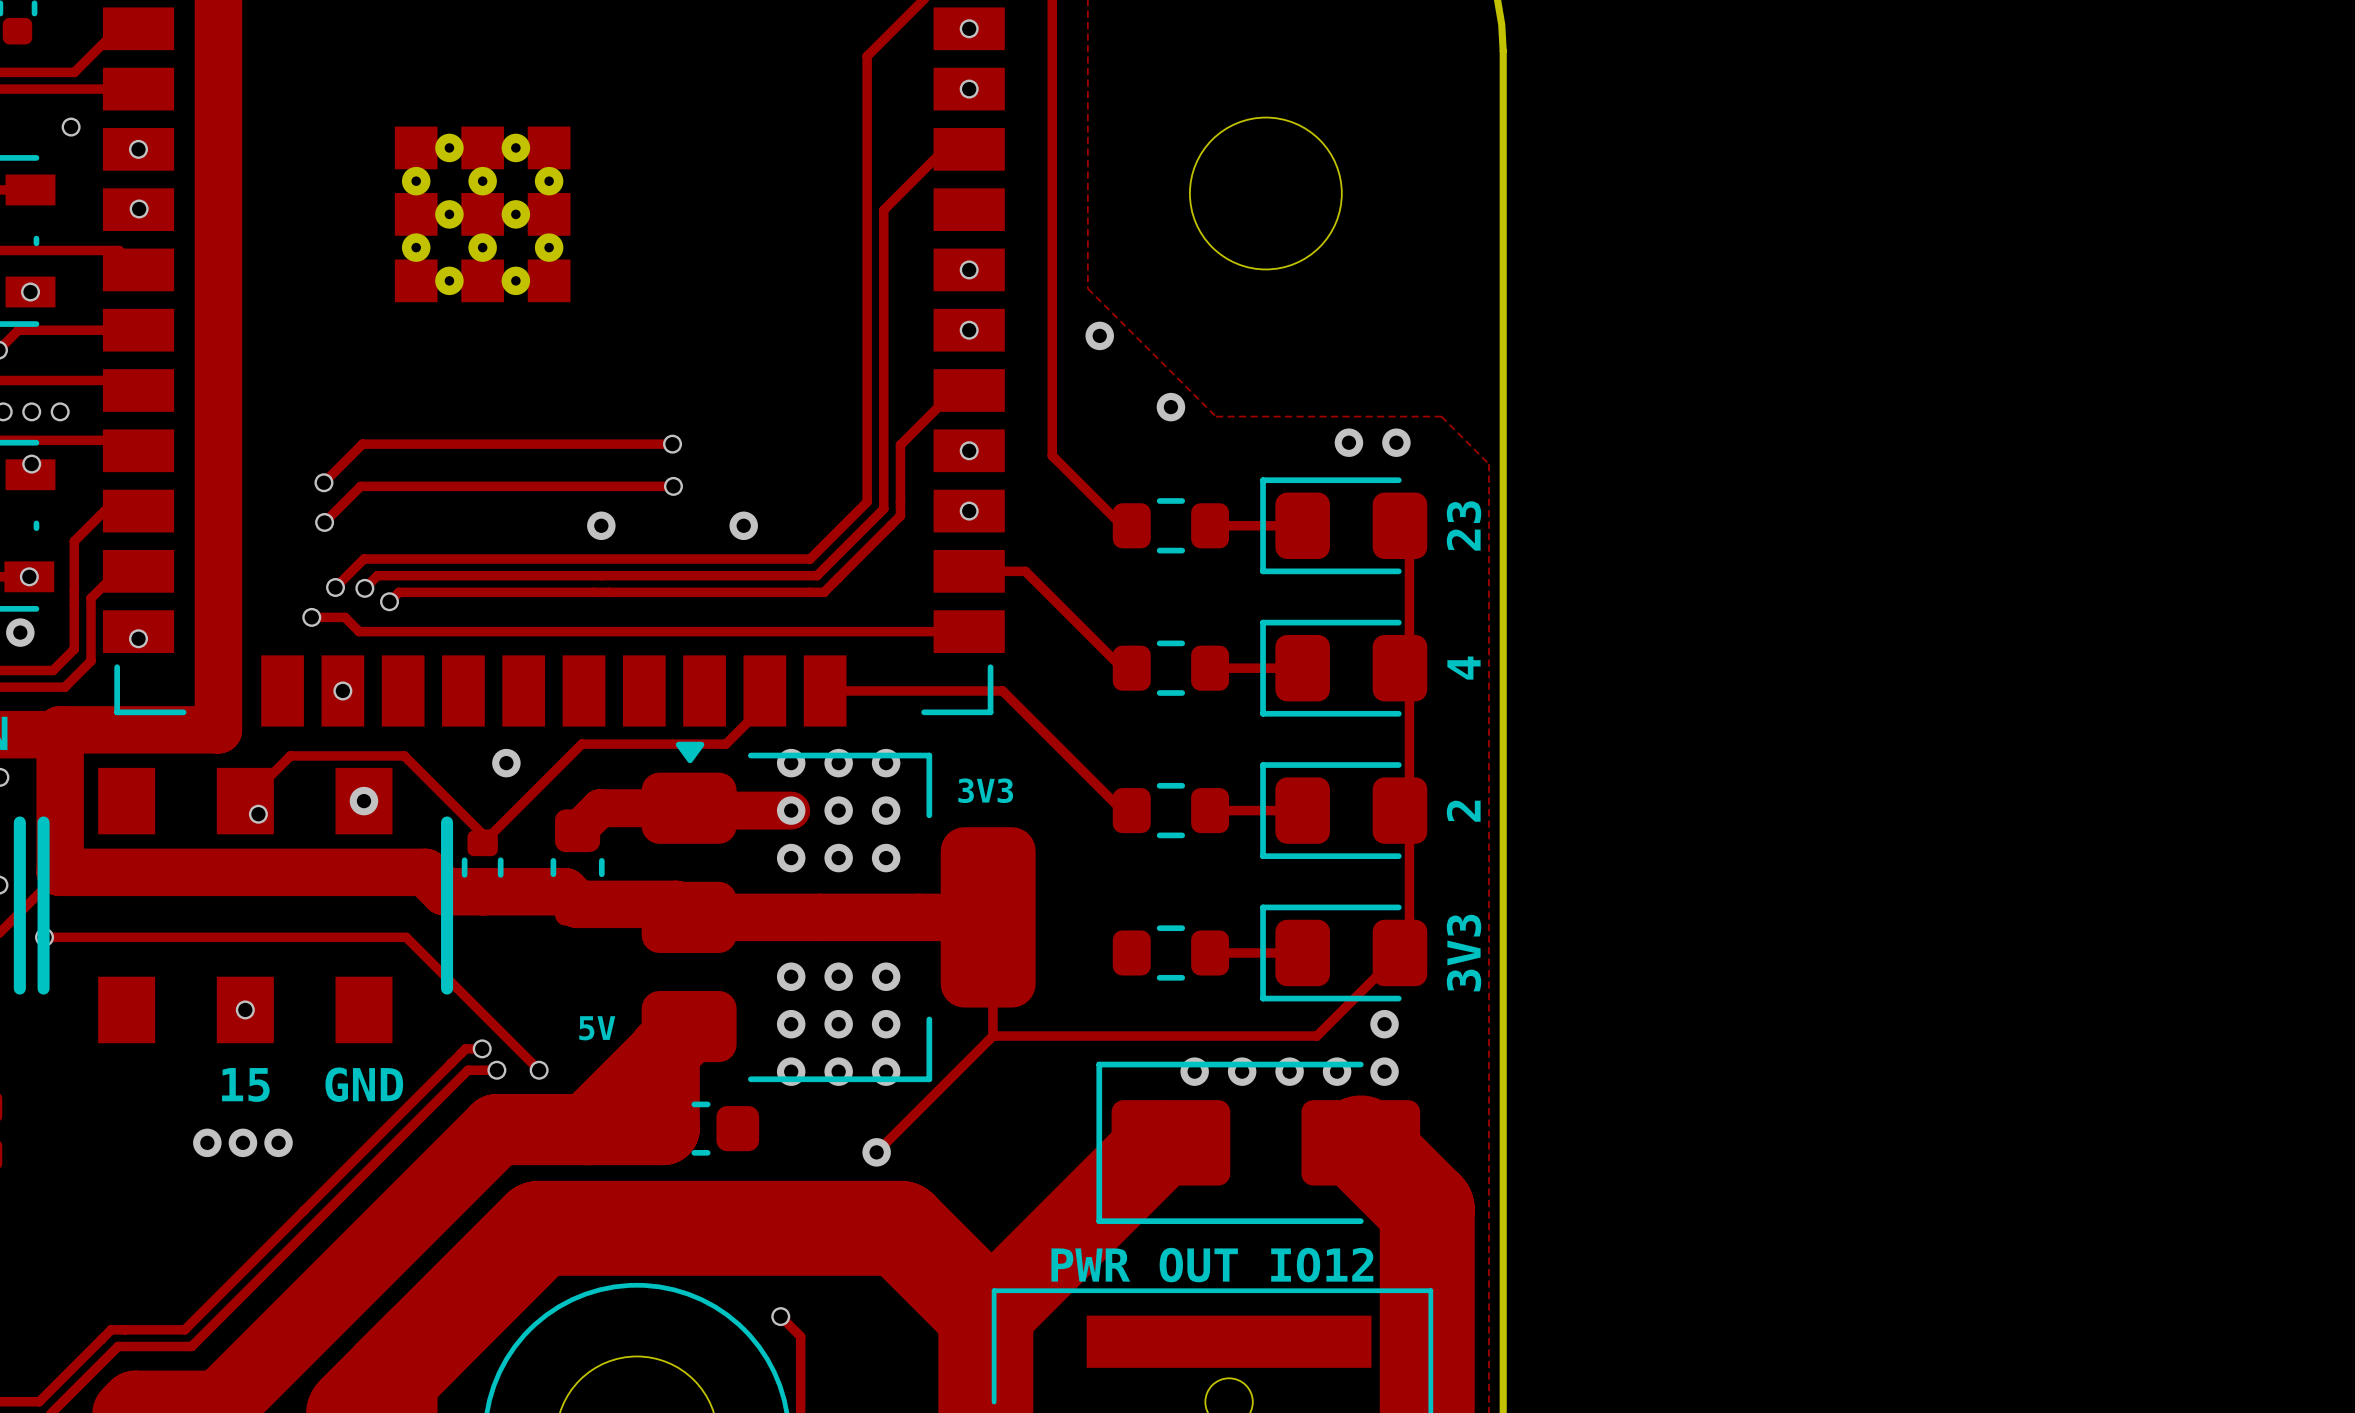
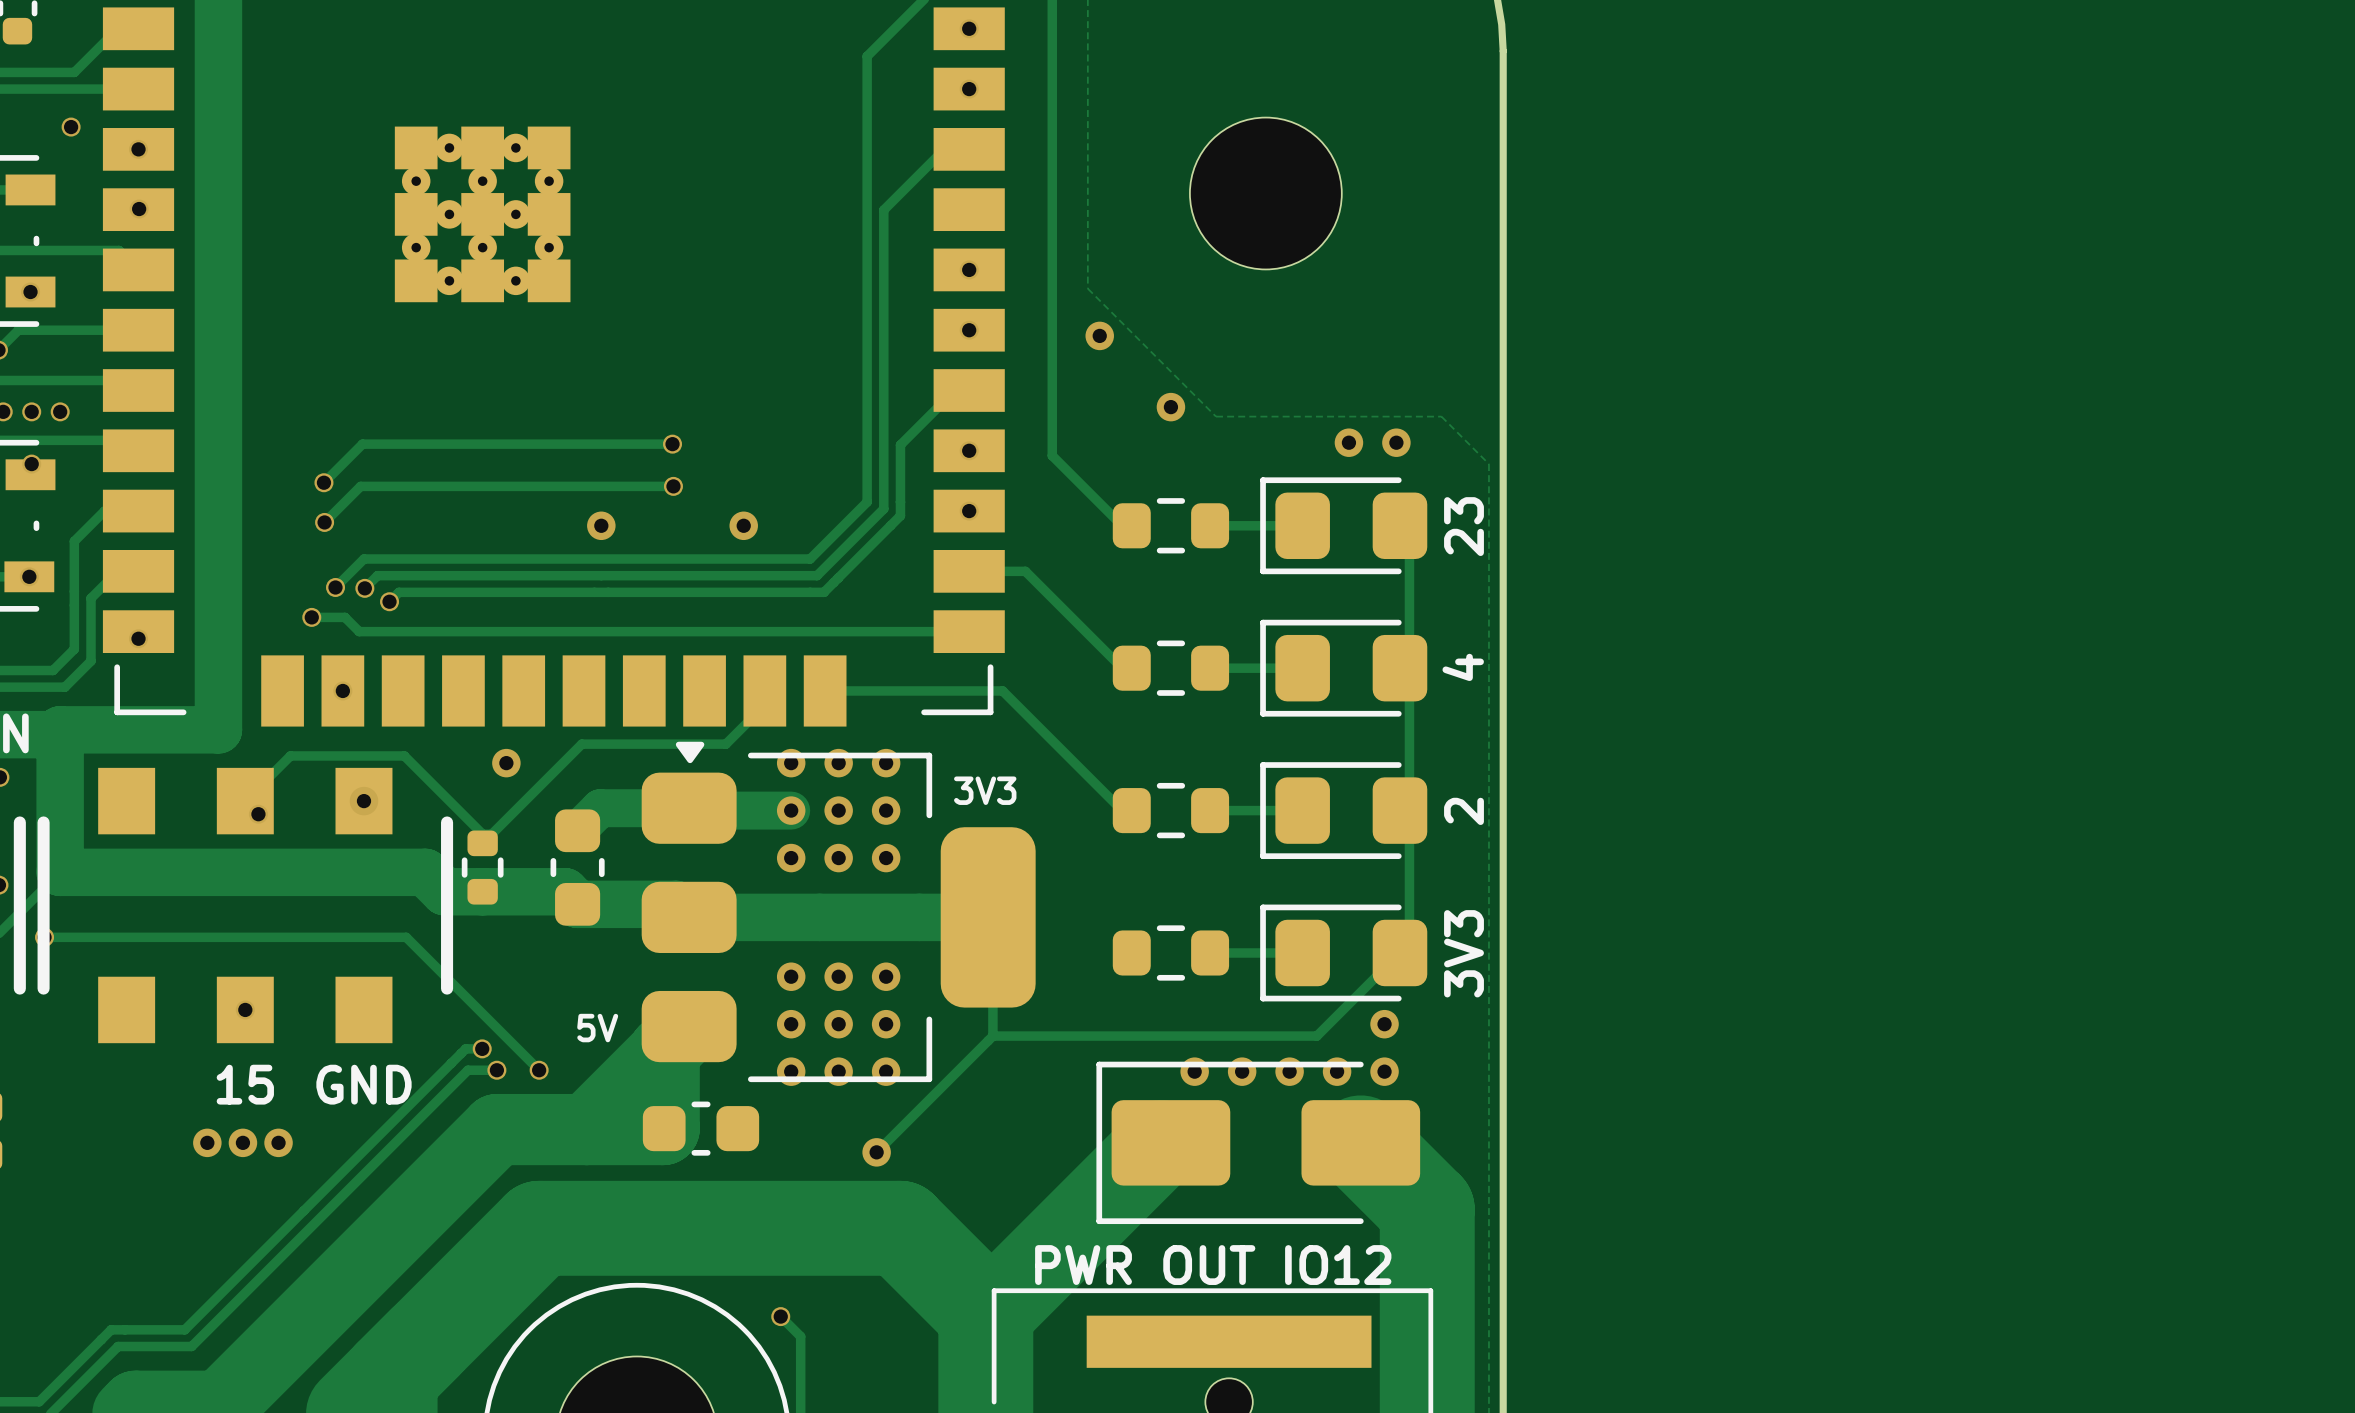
via: (20, 632) -> none

